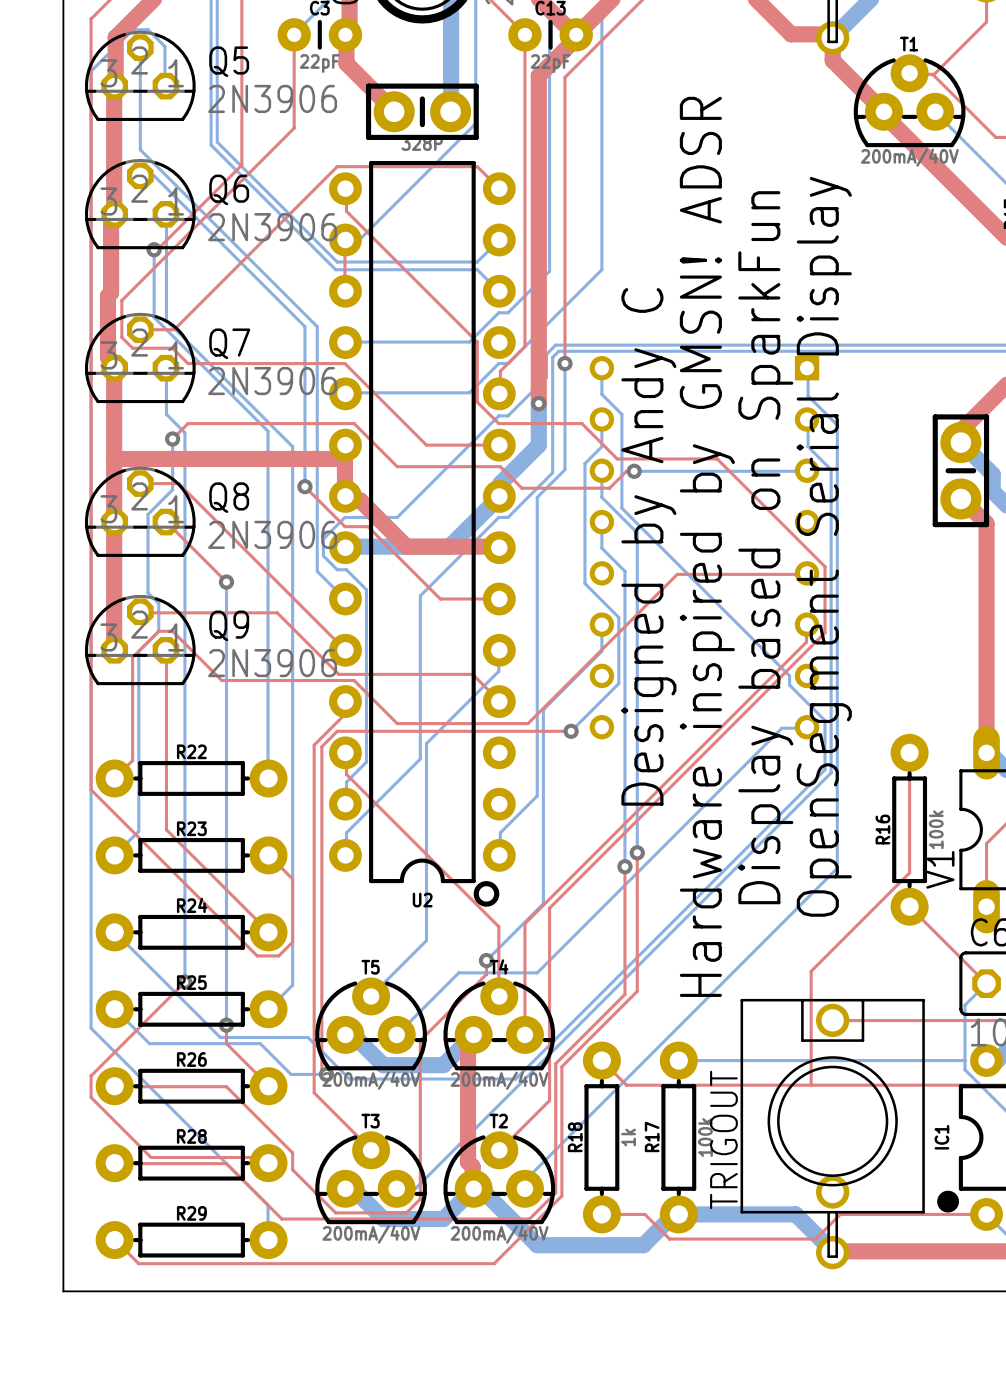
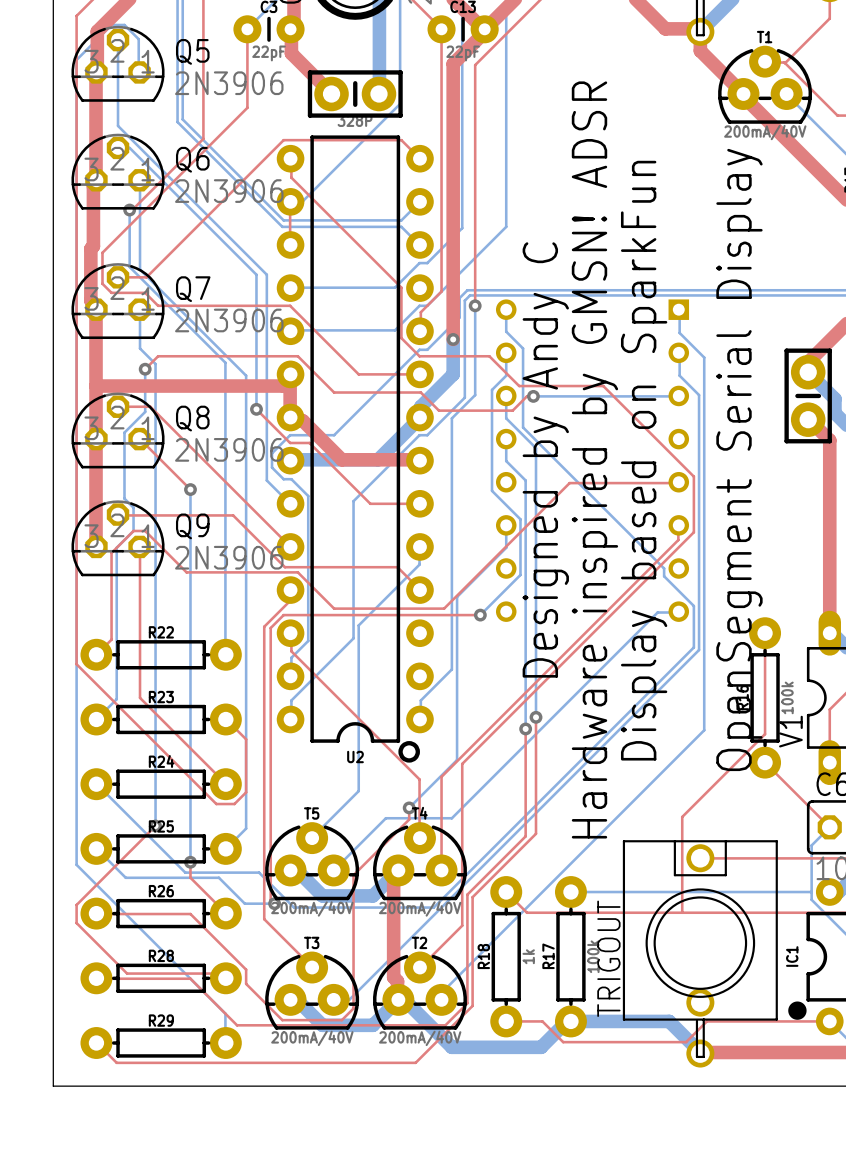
text position: OpenSegment Serial Display (824, 546) -> OpenSegment Serial Display (739, 459)

